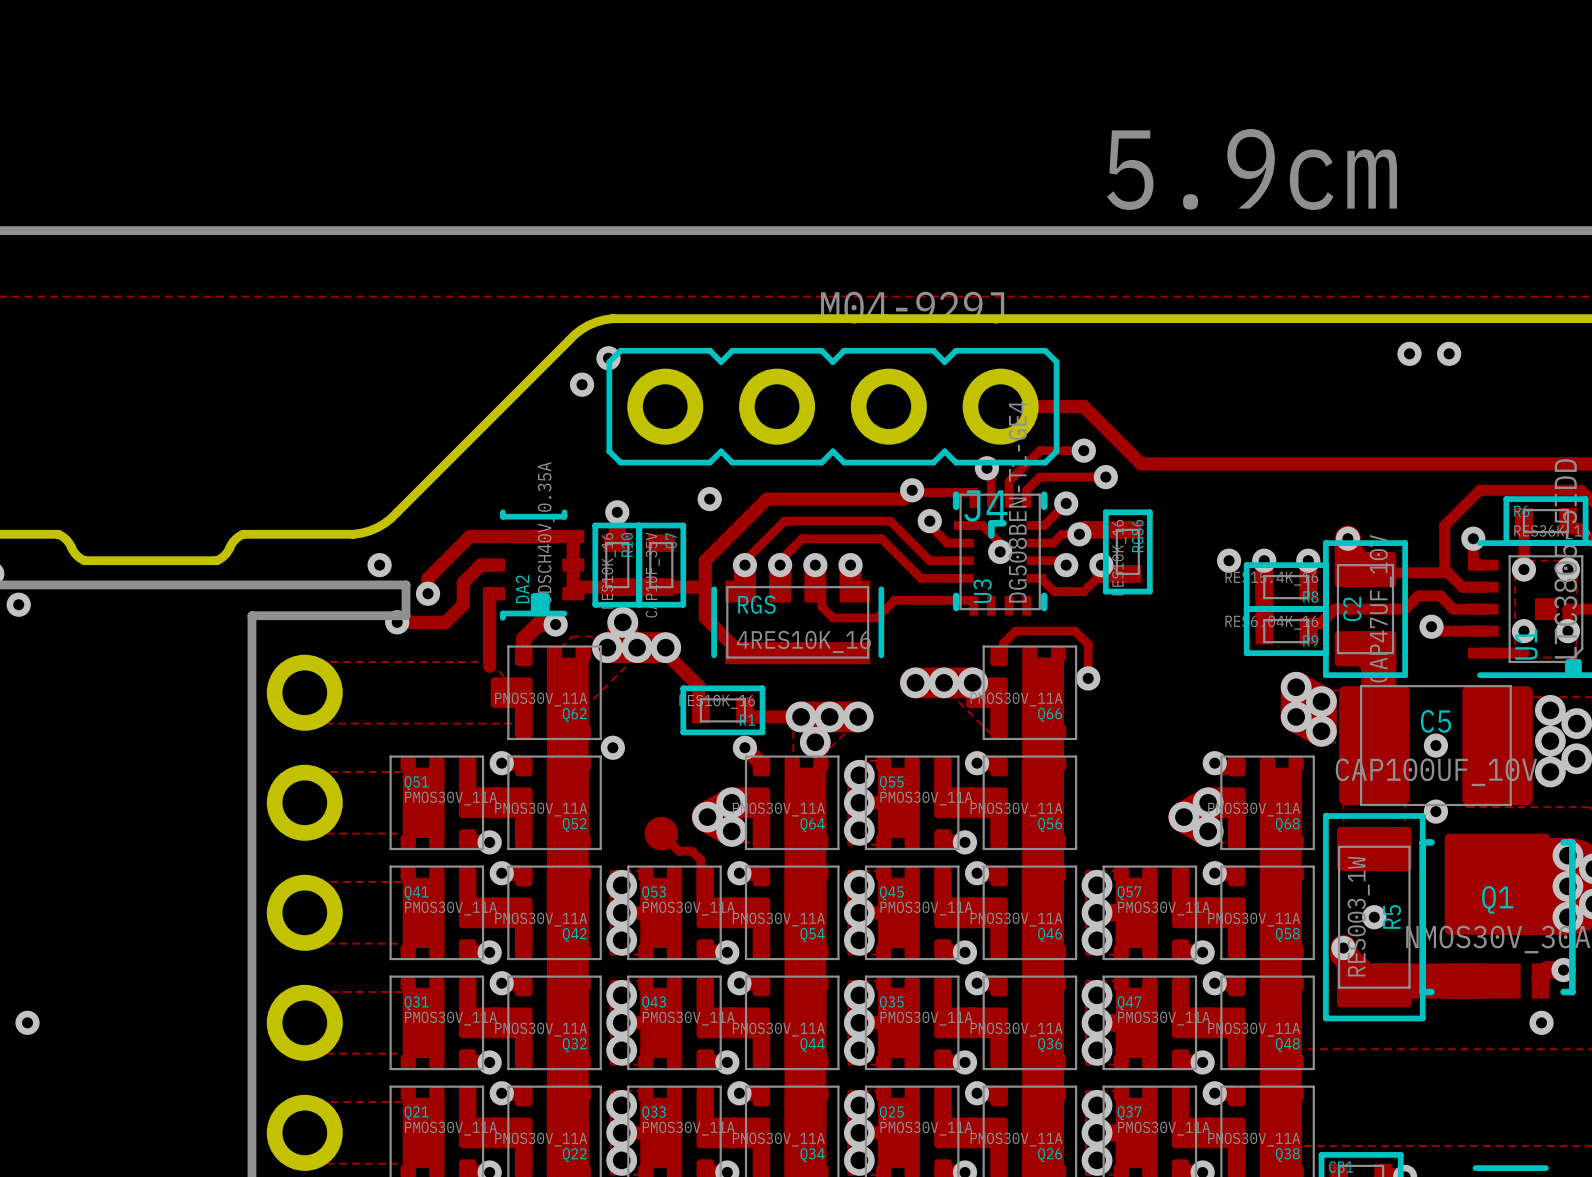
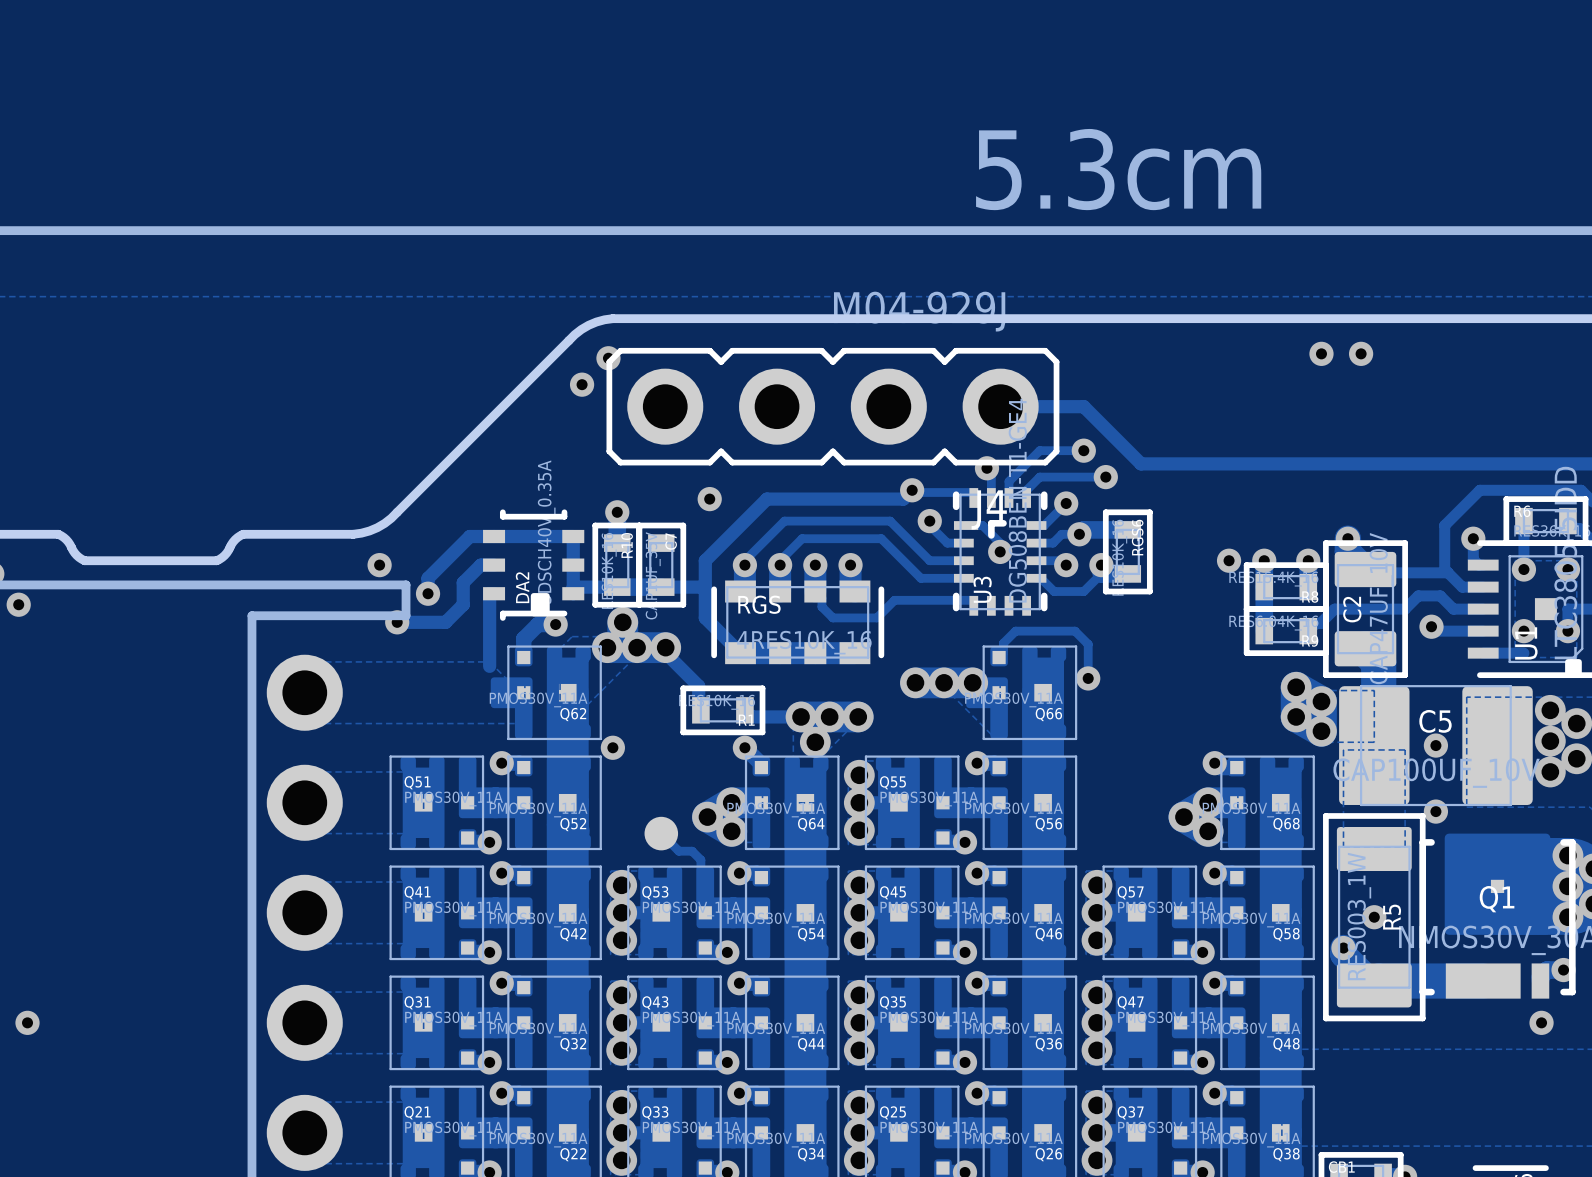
text: 5.9cm (1252, 169) -> 5.3cm (1118, 169)
via: none -> (1321, 353)
via: none -> (1361, 353)
via: (1409, 353) -> none
via: (1449, 353) -> none

